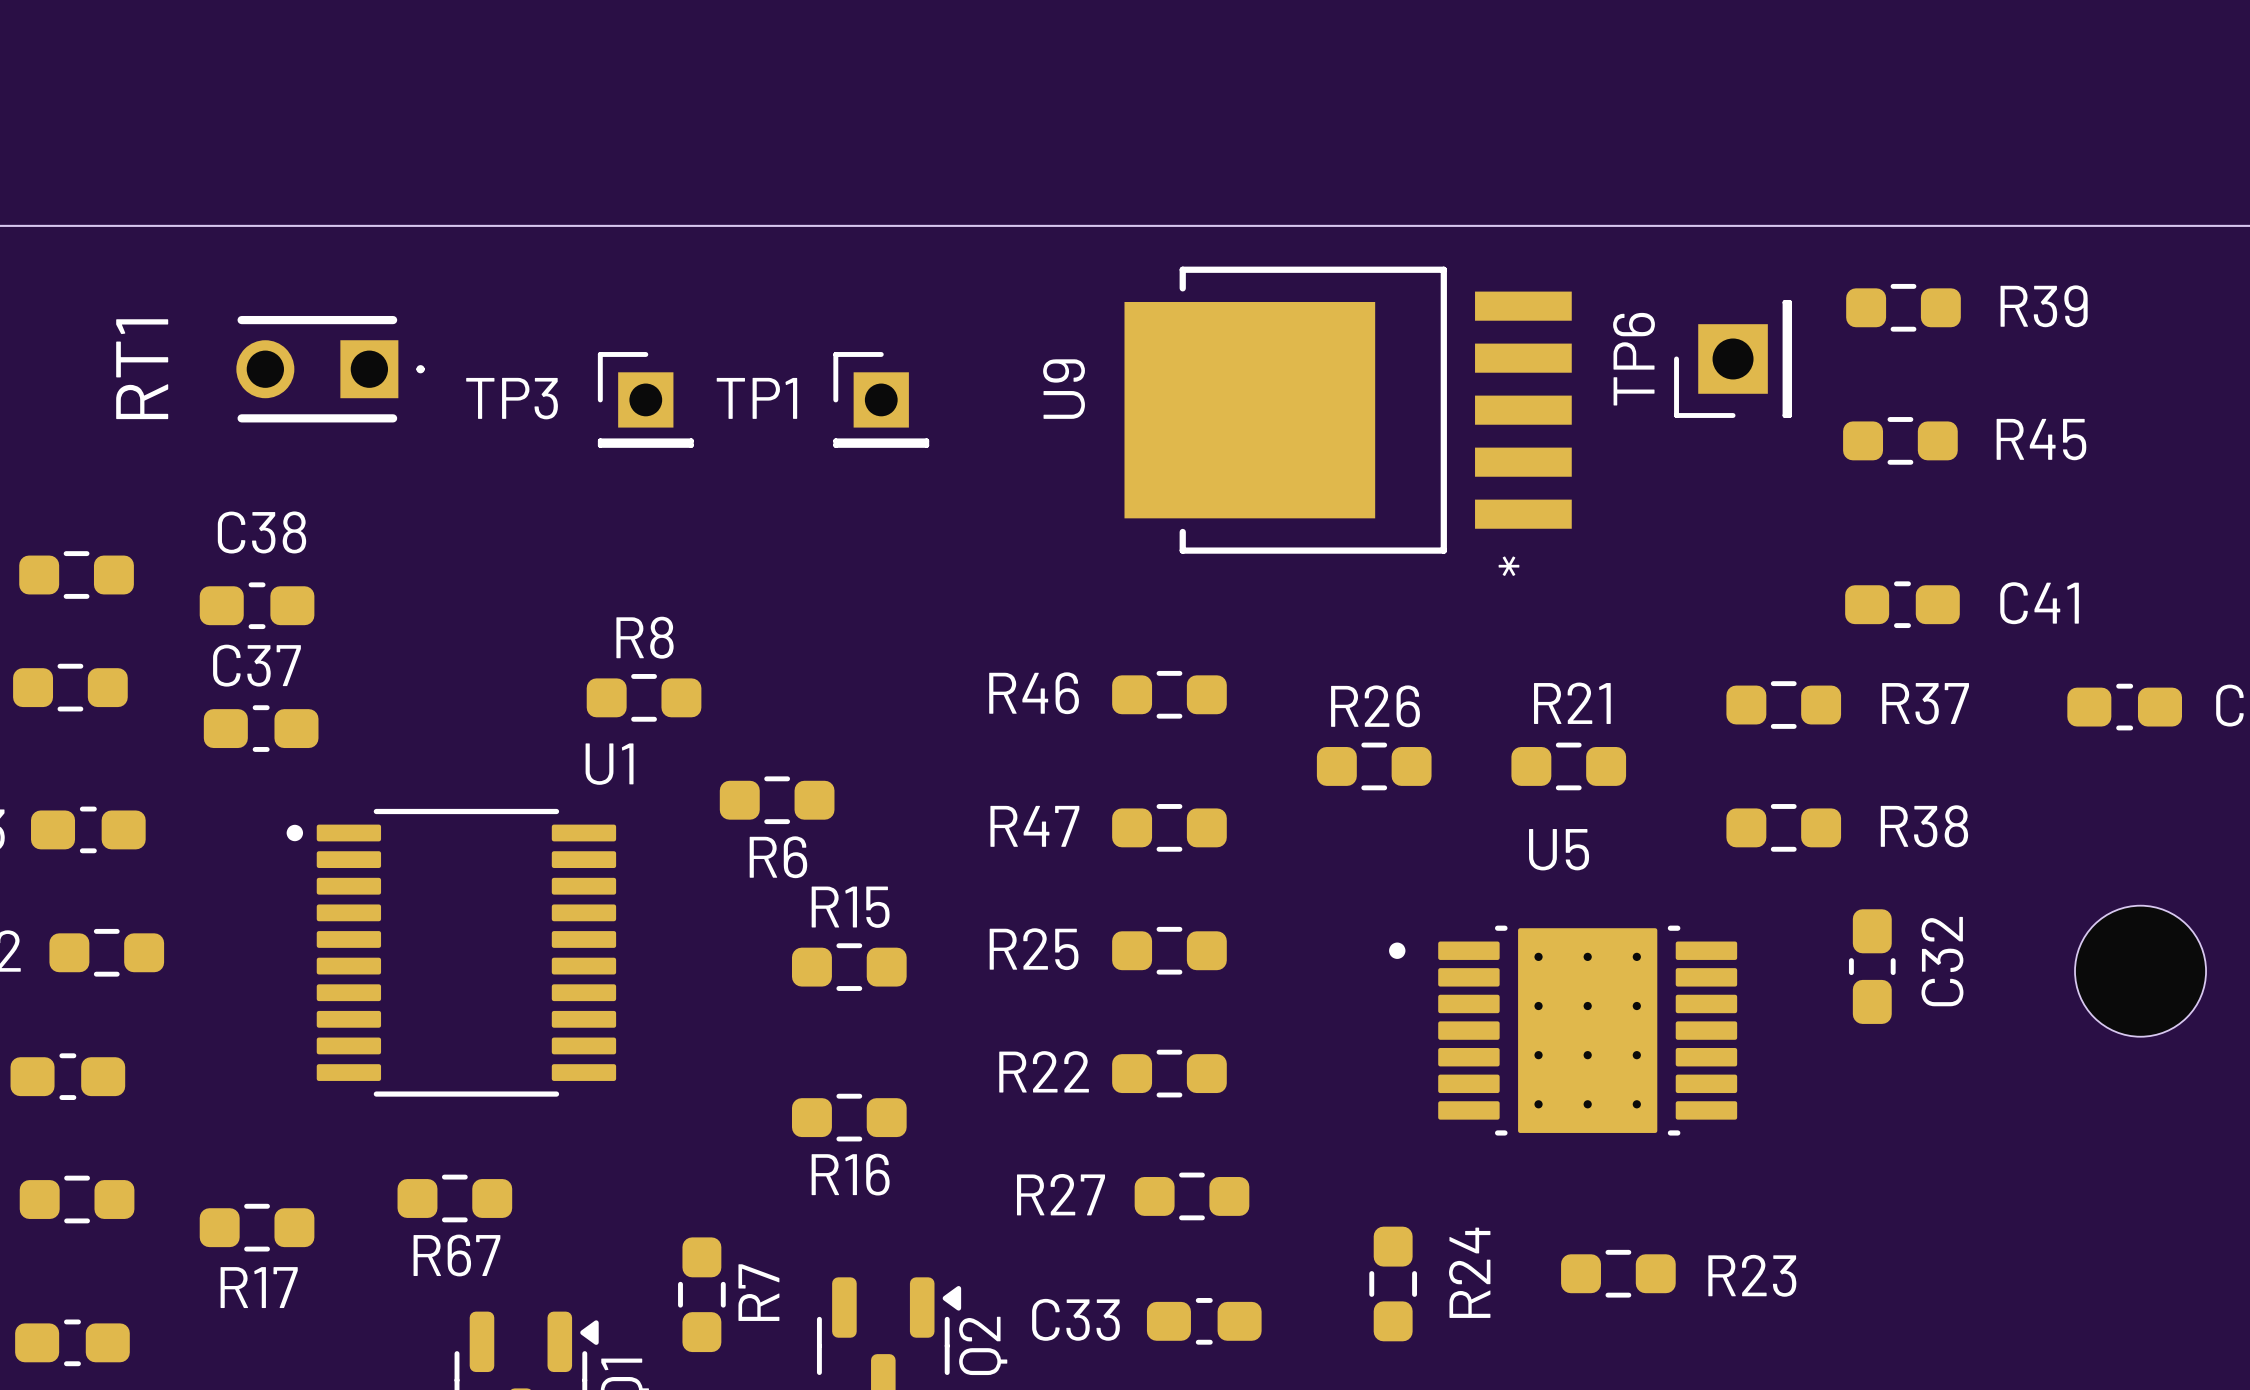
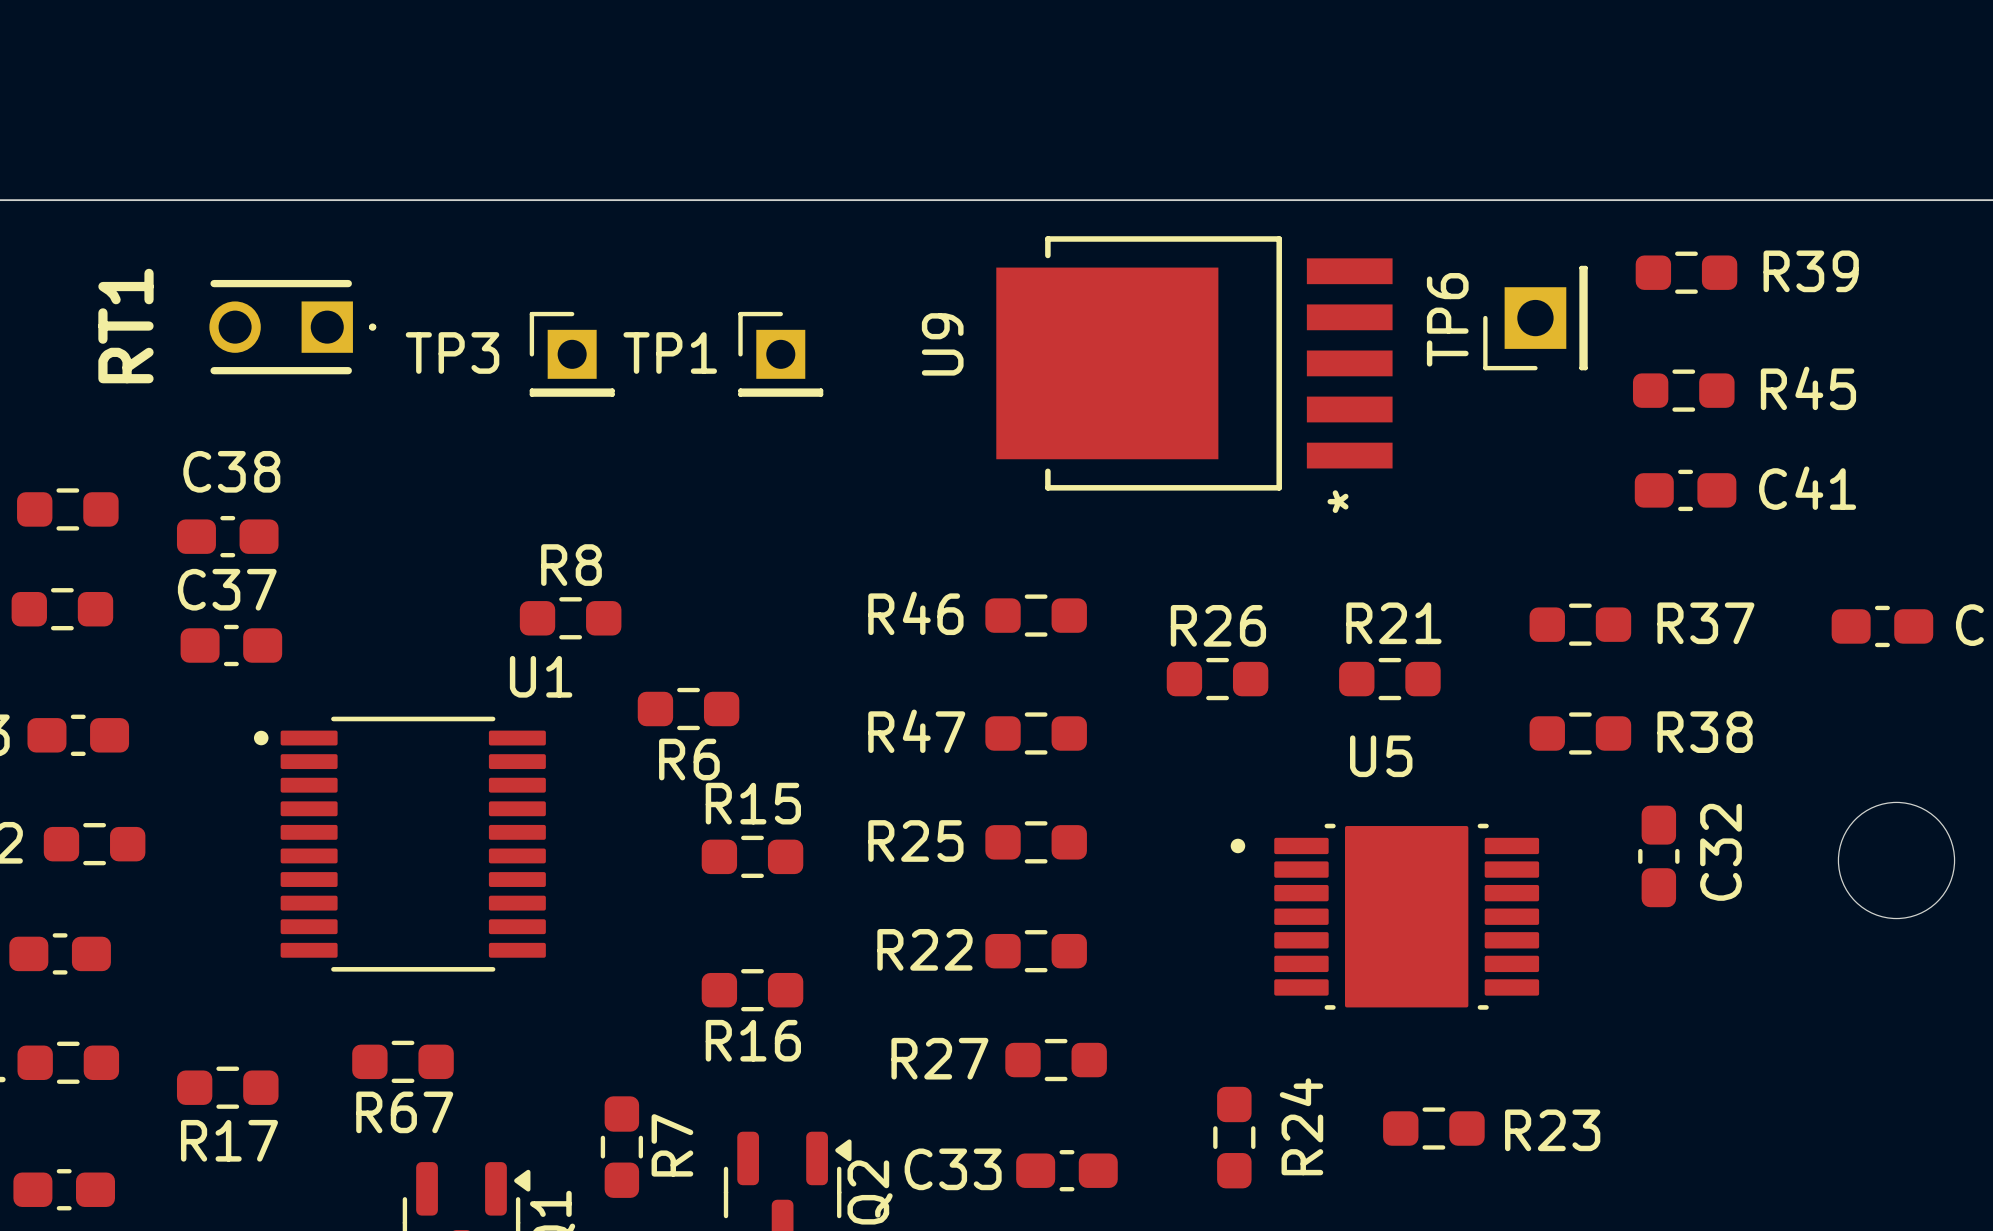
C41 position: (1902, 604) -> (1685, 490)
U5 footprint: [1389, 925, 1738, 1136] -> [1230, 823, 1540, 1010]

